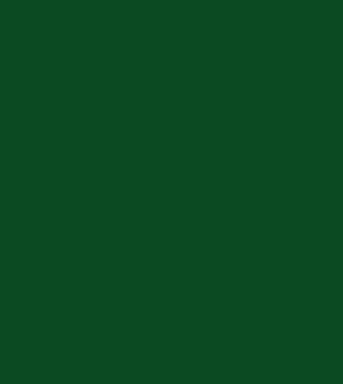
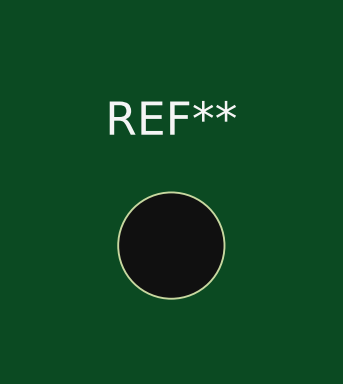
REF**: none -> (171, 245)

